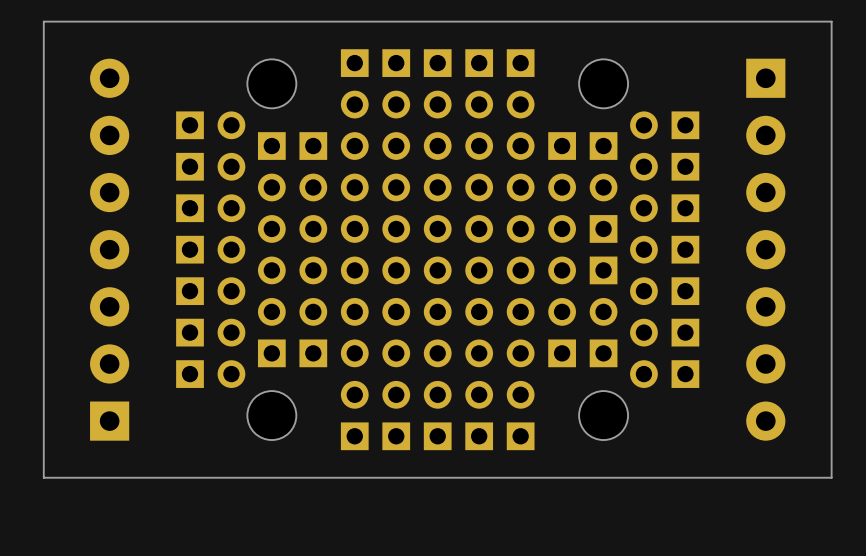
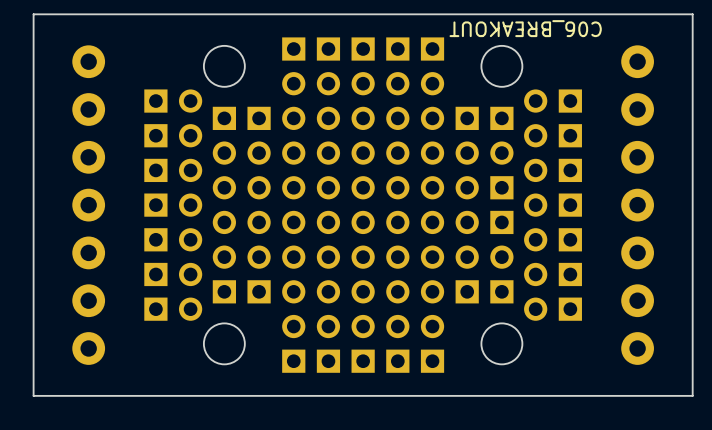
text: none -> C06_BREAKOUT (525, 28)
part footprint: [90, 58, 130, 441] -> [72, 45, 106, 365]
part footprint: [746, 58, 786, 441] -> [621, 45, 654, 365]

